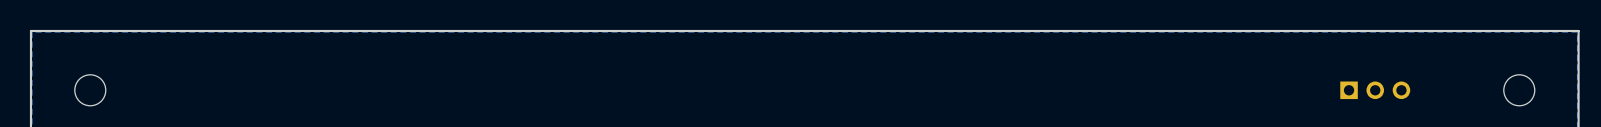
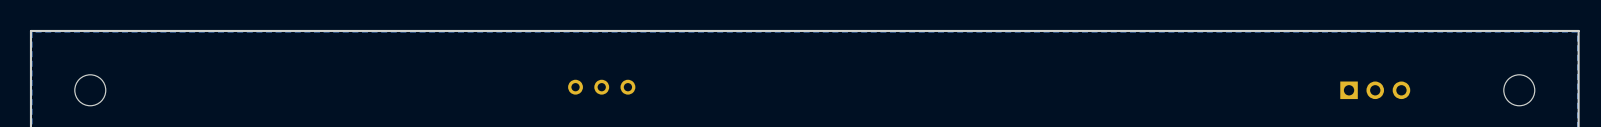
part: none -> (601, 87)

